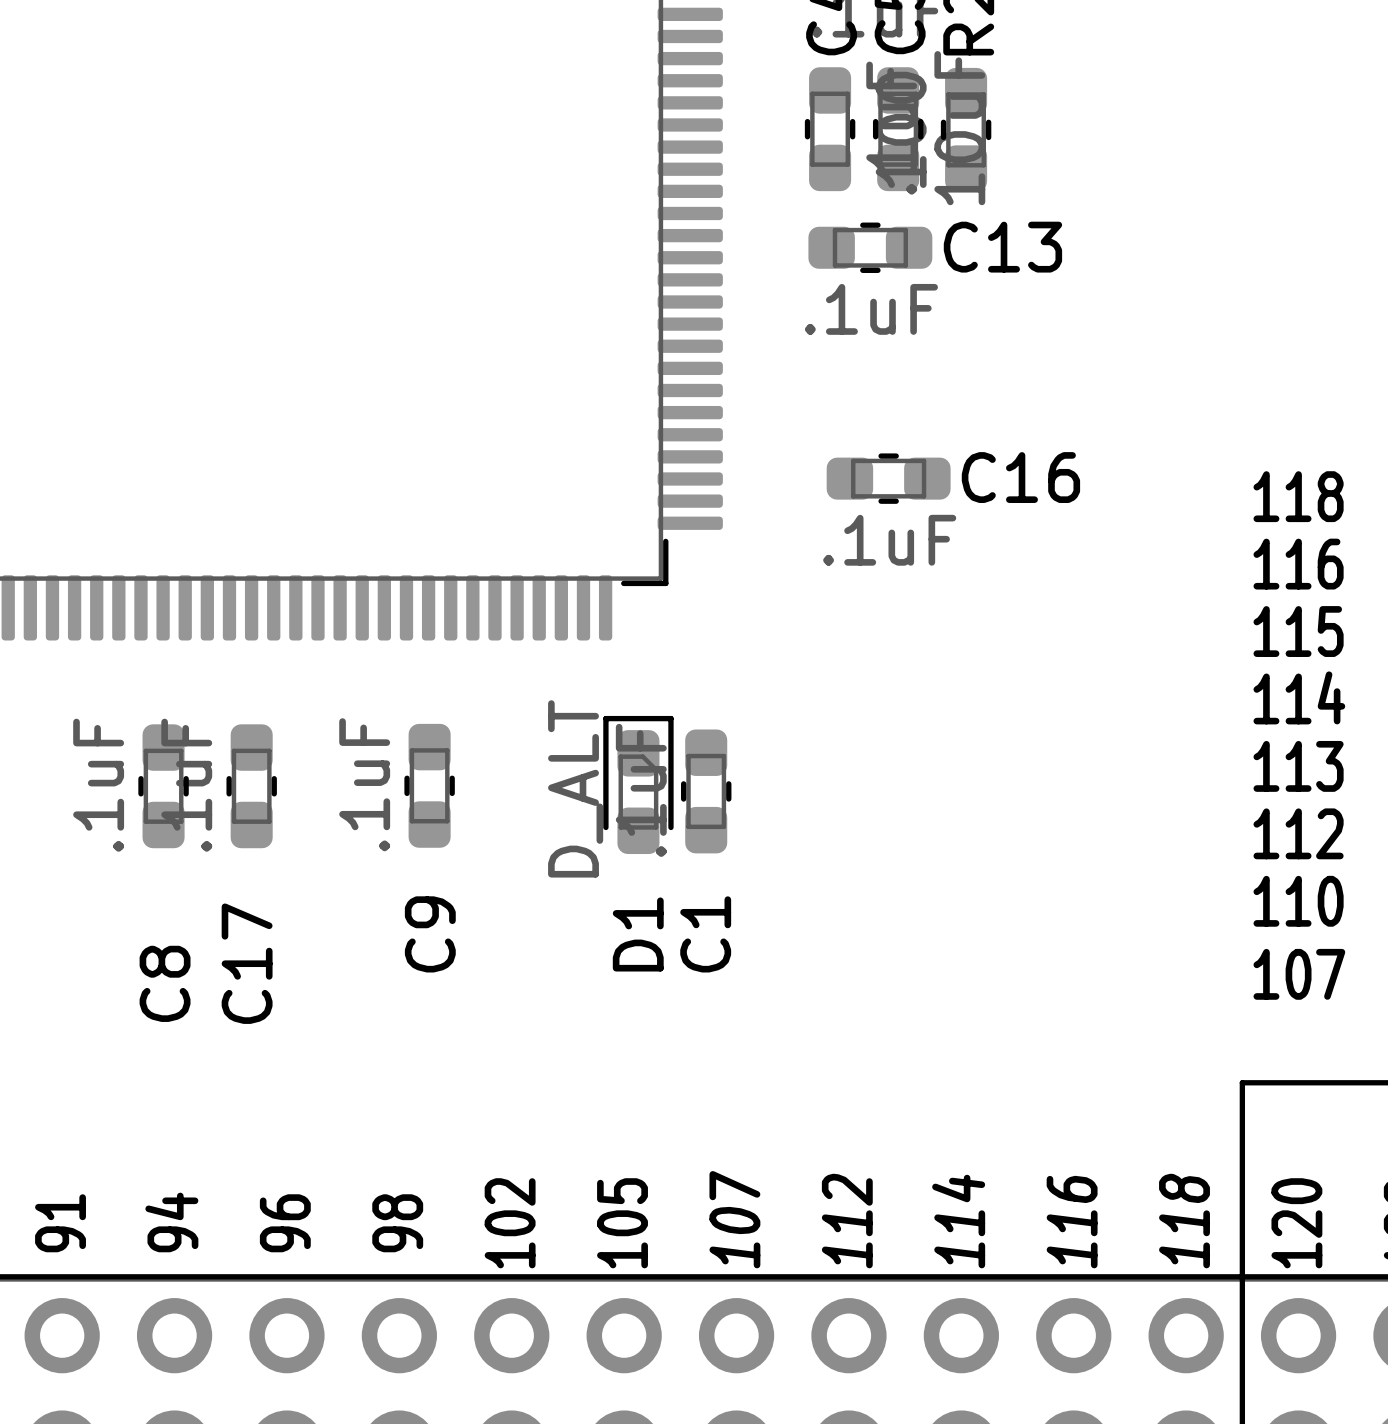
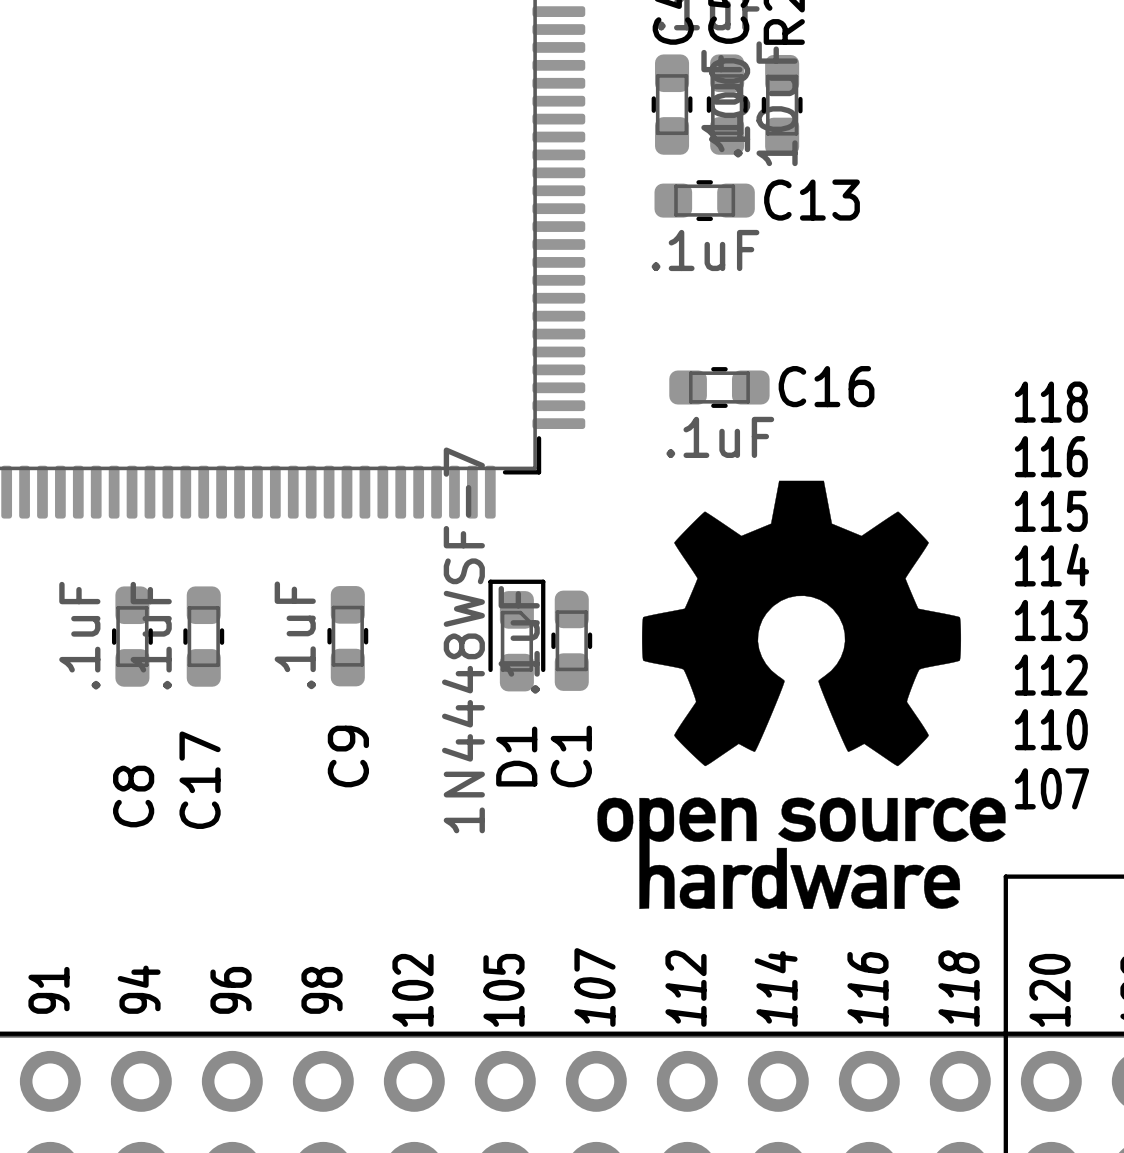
drawing: none -> [597, 480, 1006, 910]
D1 value: D_ALT (575, 788) -> 1N4448WSF-7 (463, 640)

